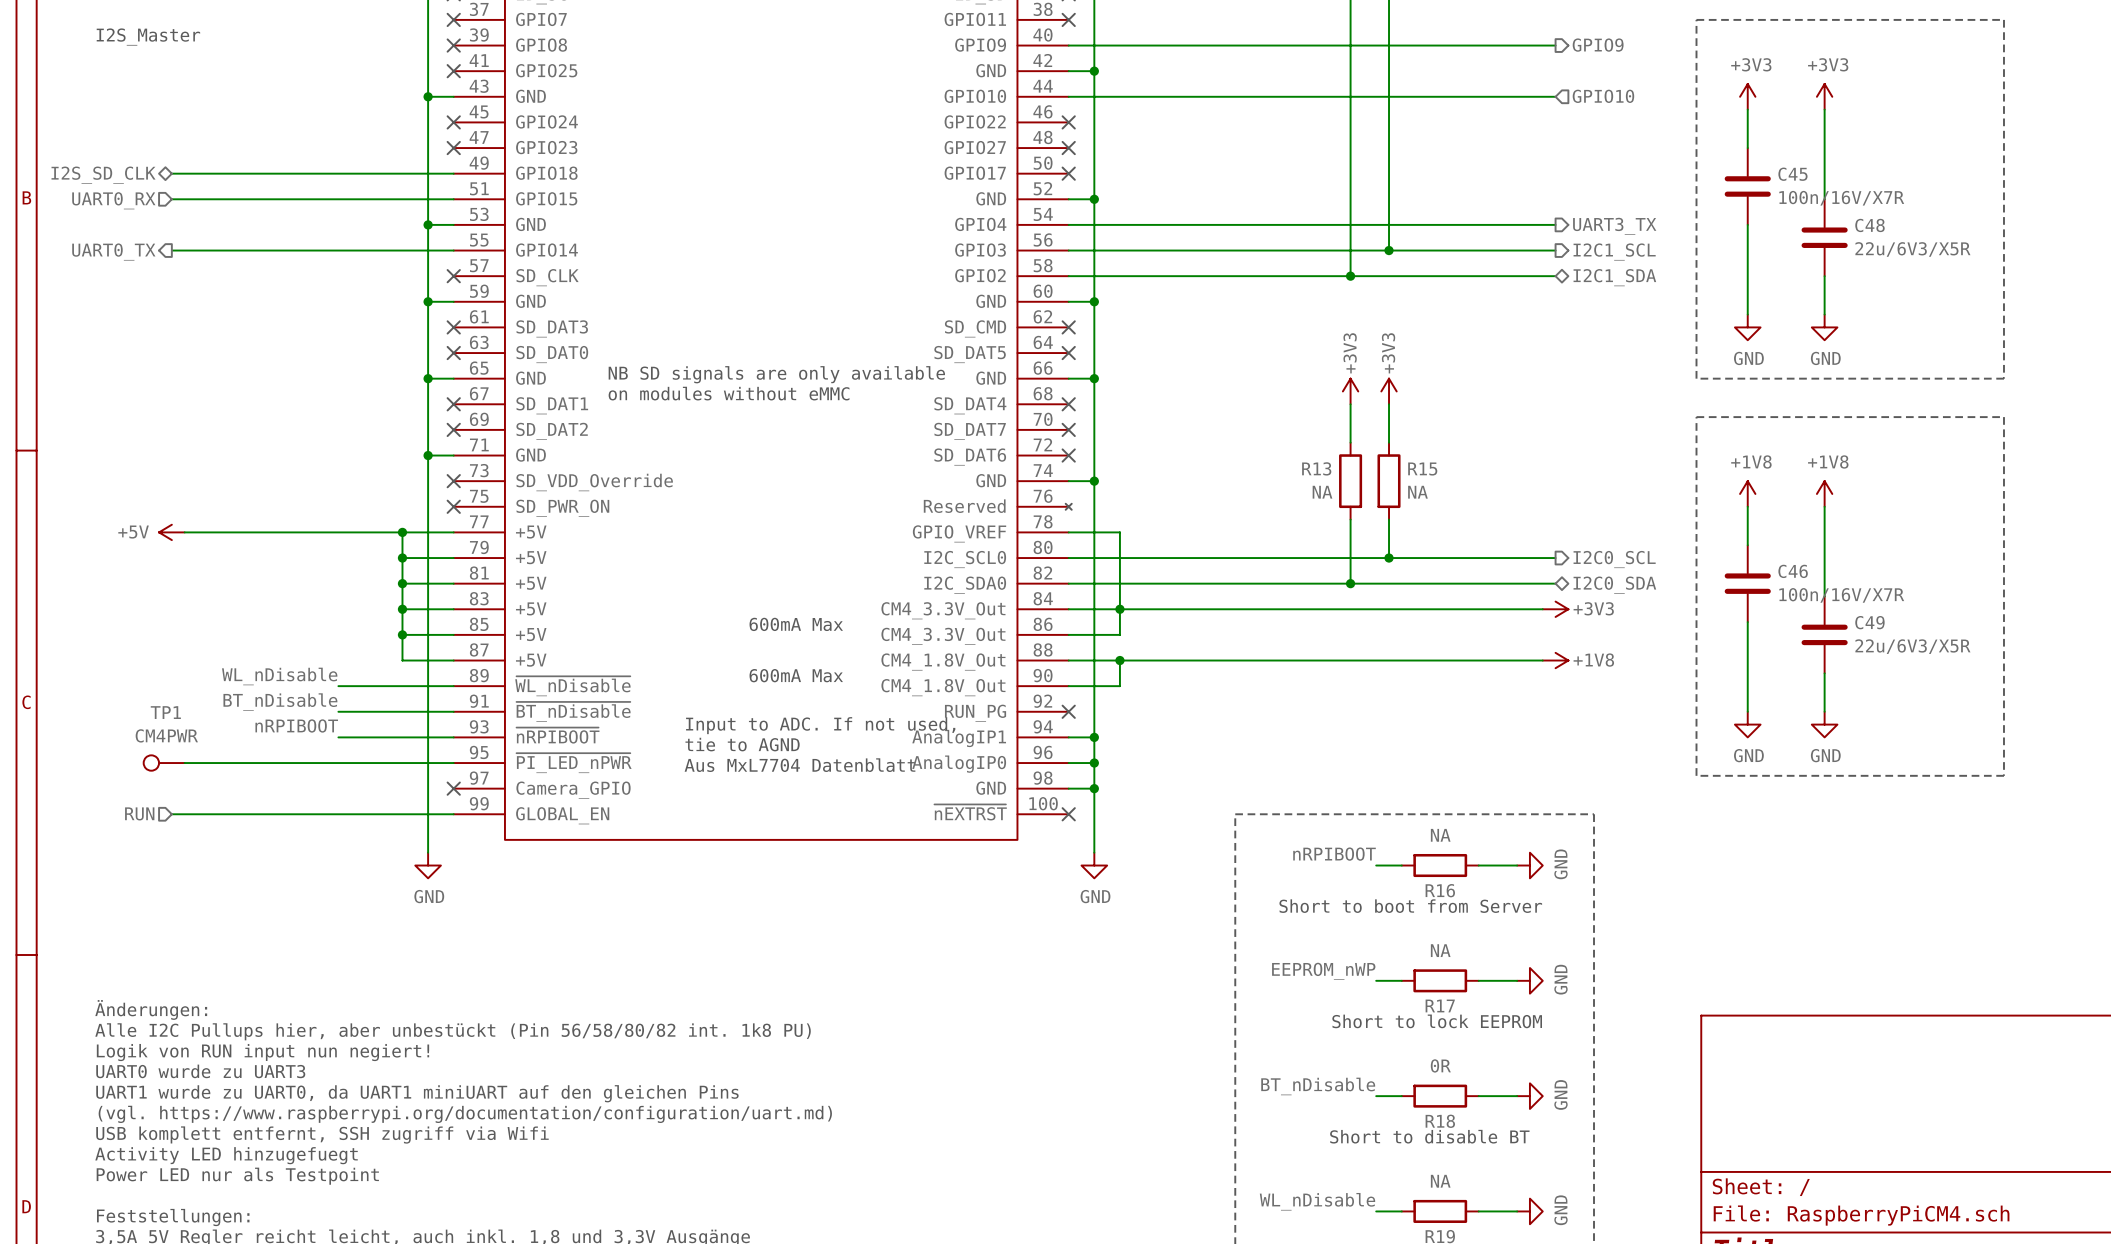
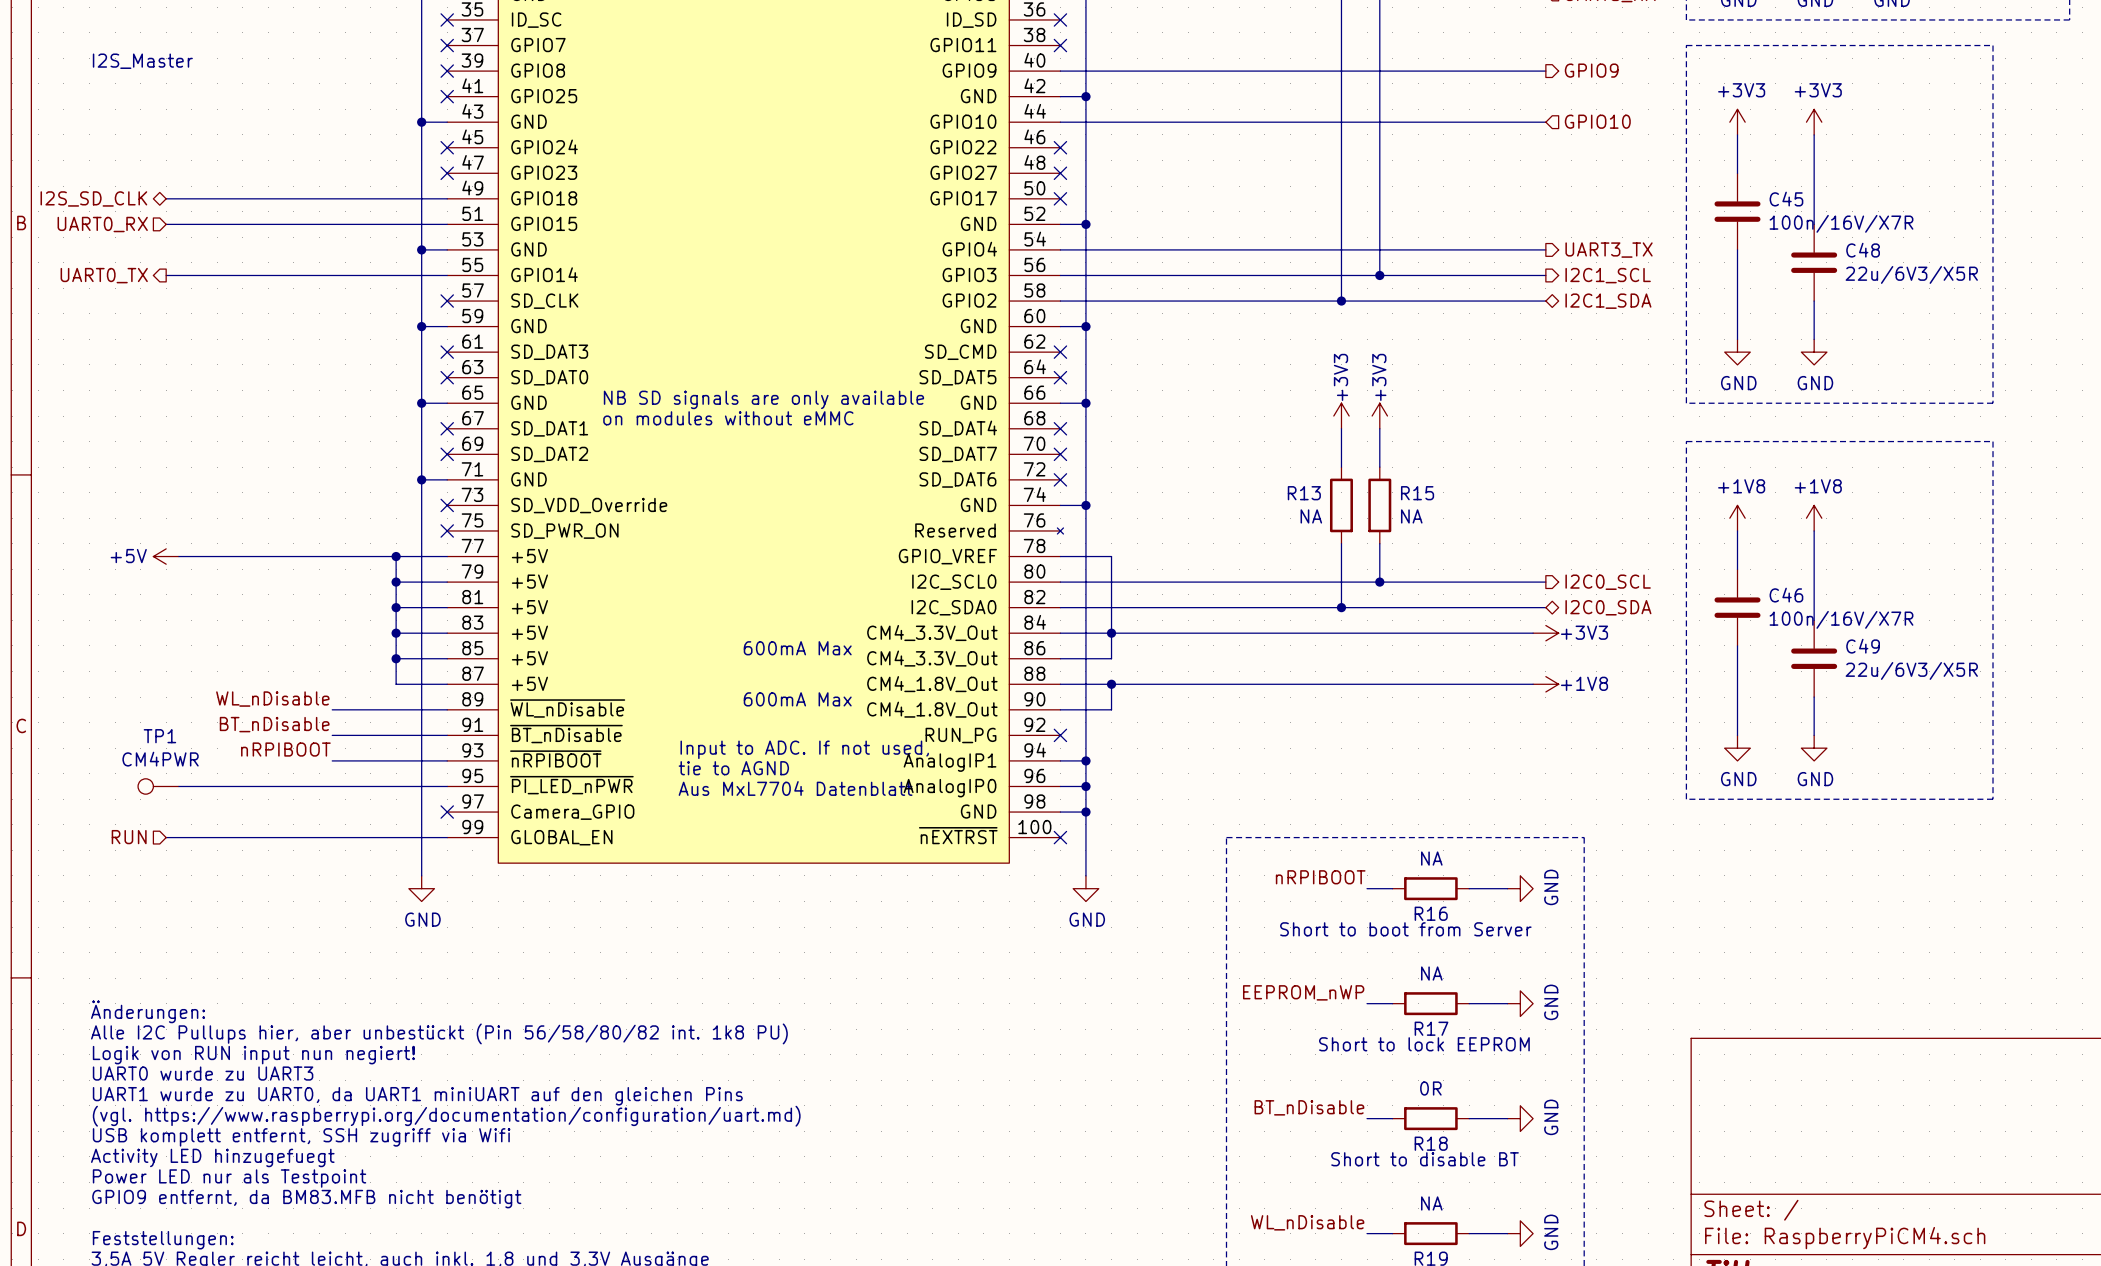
text: none -> Änderungen: (148, 1011)
text: Änderungen: (151, 1009) -> Alle I2C Pullups hier, aber unbestückt (Pin 56/58/80/82 int. 1k8 PU) (439, 1033)
text: Alle I2C Pullups hier, aber unbestückt (Pin 56/58/80/82 int. 1k8 PU) (453, 1031) -> Logik von RUN input nun negiert! (253, 1055)
text: Logik von RUN input nun negiert! (262, 1052) -> UART0 wurde zu UART3 (203, 1073)
text: UART0 wurde zu UART3 (200, 1071) -> UART1 wurde zu UART0, da UART1 miniUART auf den gleichen Pins (417, 1096)
text: UART1 wurde zu UART0, da UART1 miniUART auf den gleichen Pins (417, 1093) -> (vgl. https://www.raspberrypi.org/documentation/configuration/uart.md) (446, 1116)
text: (vgl. https://www.raspberrypi.org/documentation/configuration/uart.md) (465, 1114) -> USB komplett entfernt, SSH zugriff via Wifi (301, 1137)
text: USB komplett entfernt, SSH zugriff via Wifi (322, 1135) -> Activity LED hinzugefuegt (212, 1157)
text: Activity LED hinzugefuegt (226, 1155) -> Power LED nur als Testpoint (229, 1178)
text: Power LED nur als Testpoint (237, 1176) -> GPIO9 entfernt, da BM83.MFB nicht benötigt (306, 1199)

